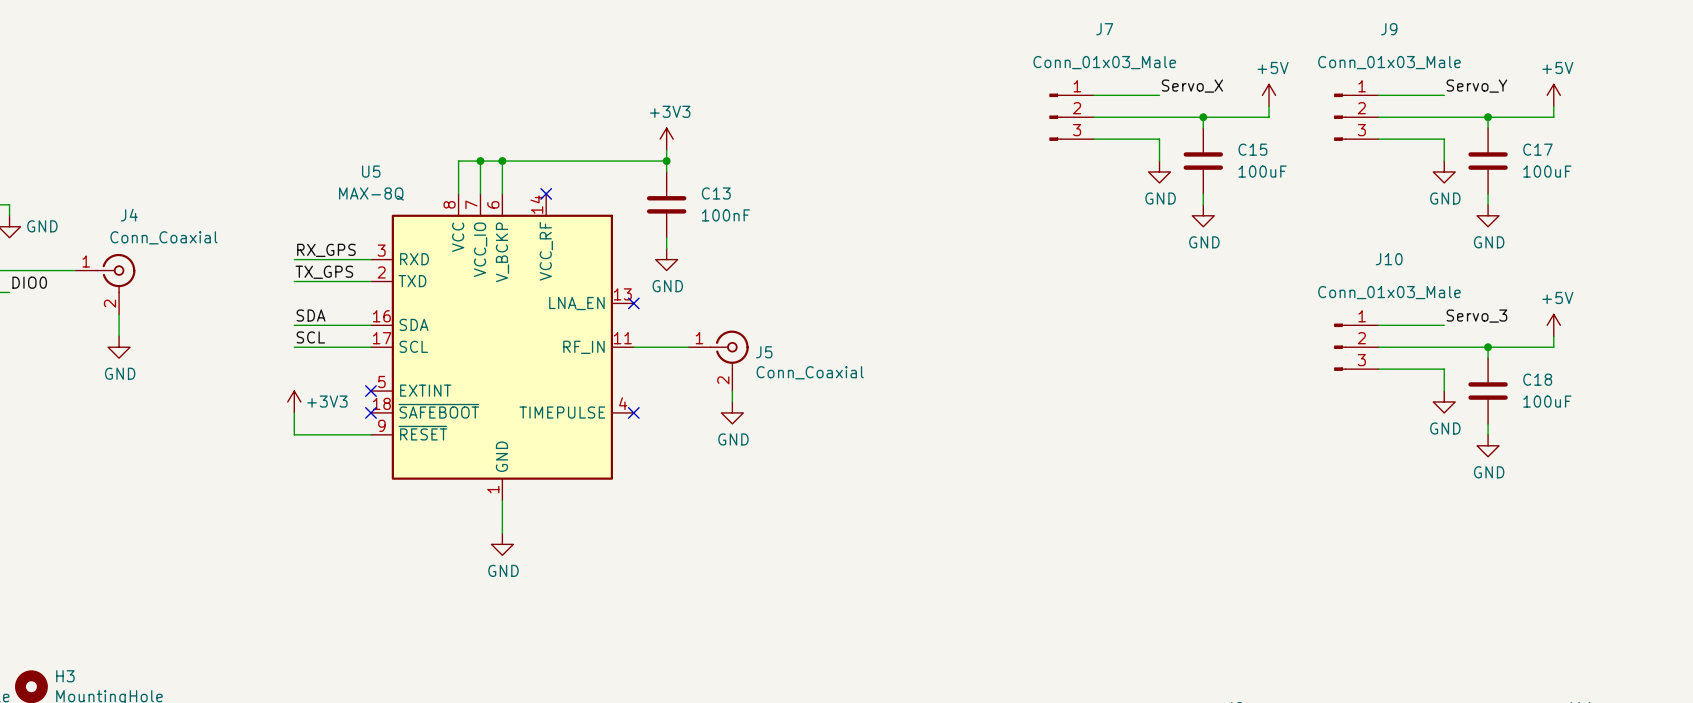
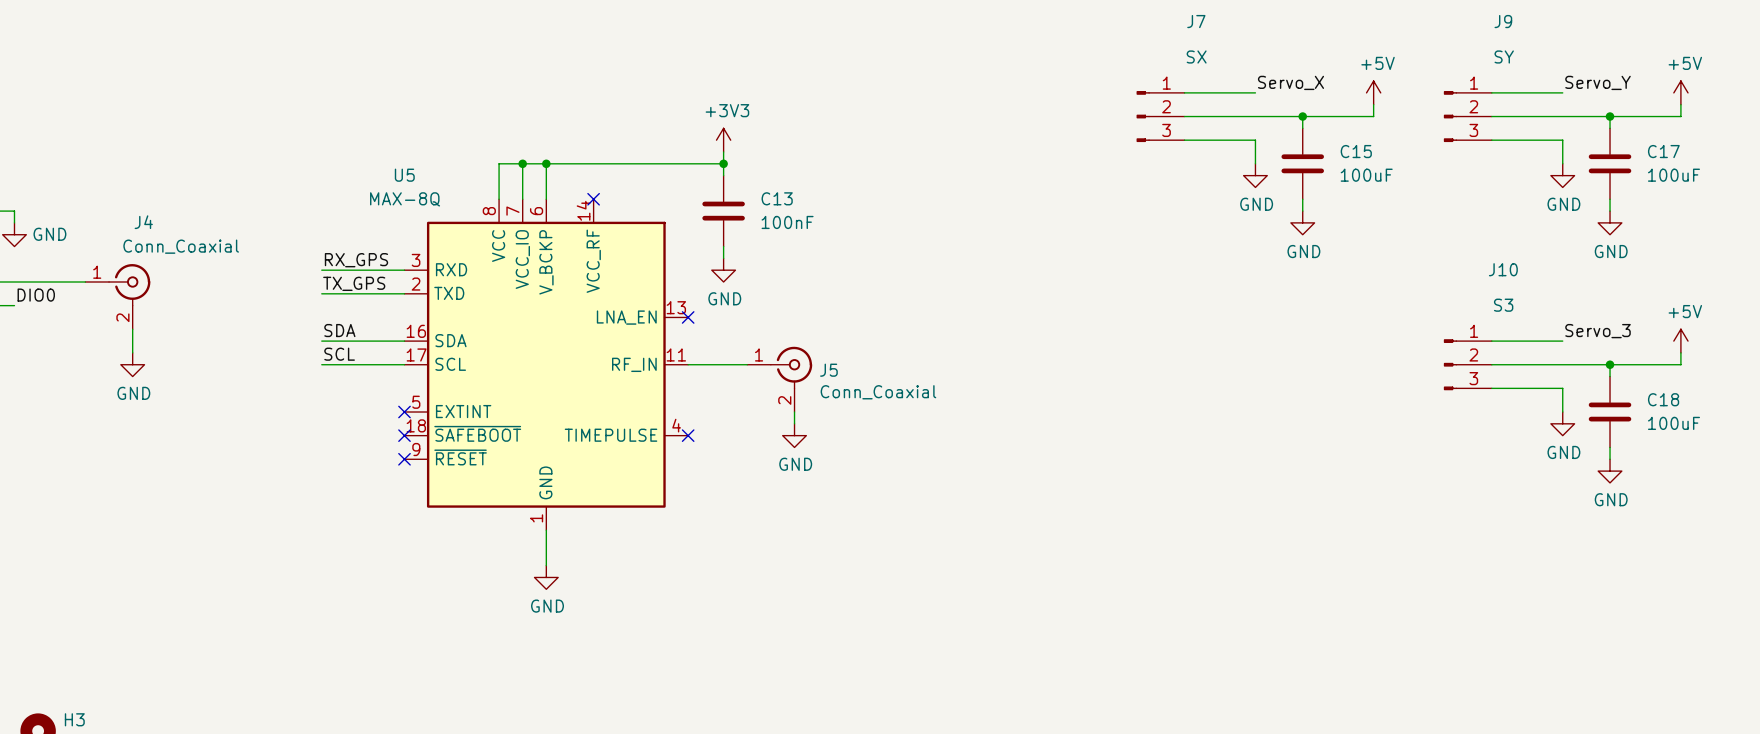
J7 value: Conn_01x03_Male (1104, 62) -> SX (1196, 57)
J9 value: Conn_01x03_Male (1389, 62) -> SY (1504, 57)
J10 value: Conn_01x03_Male (1389, 292) -> S3 (1503, 305)
power symbol: +3V3 (294, 401) -> none
wire: (294, 412) (294, 434) (370, 434) -> none
no-connect mark: none -> (404, 459)

